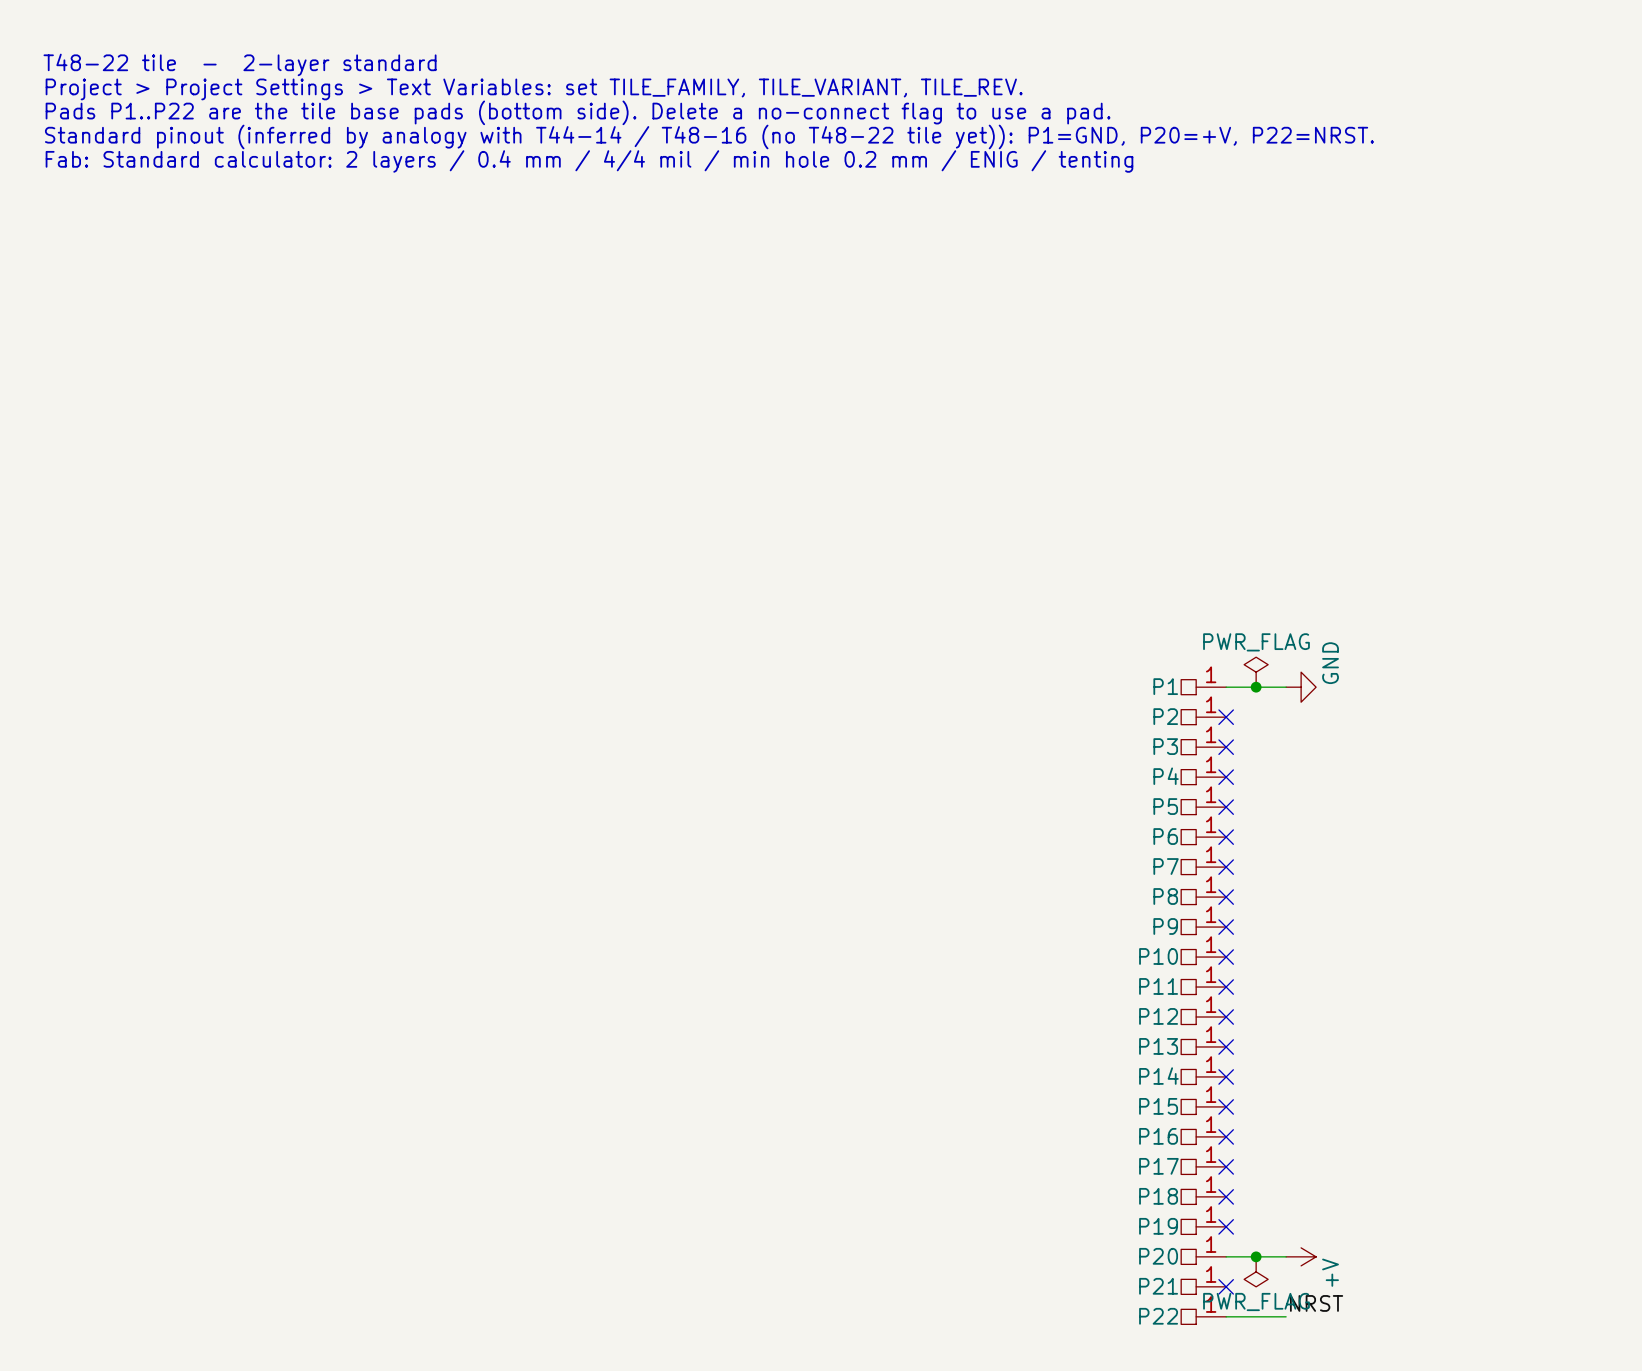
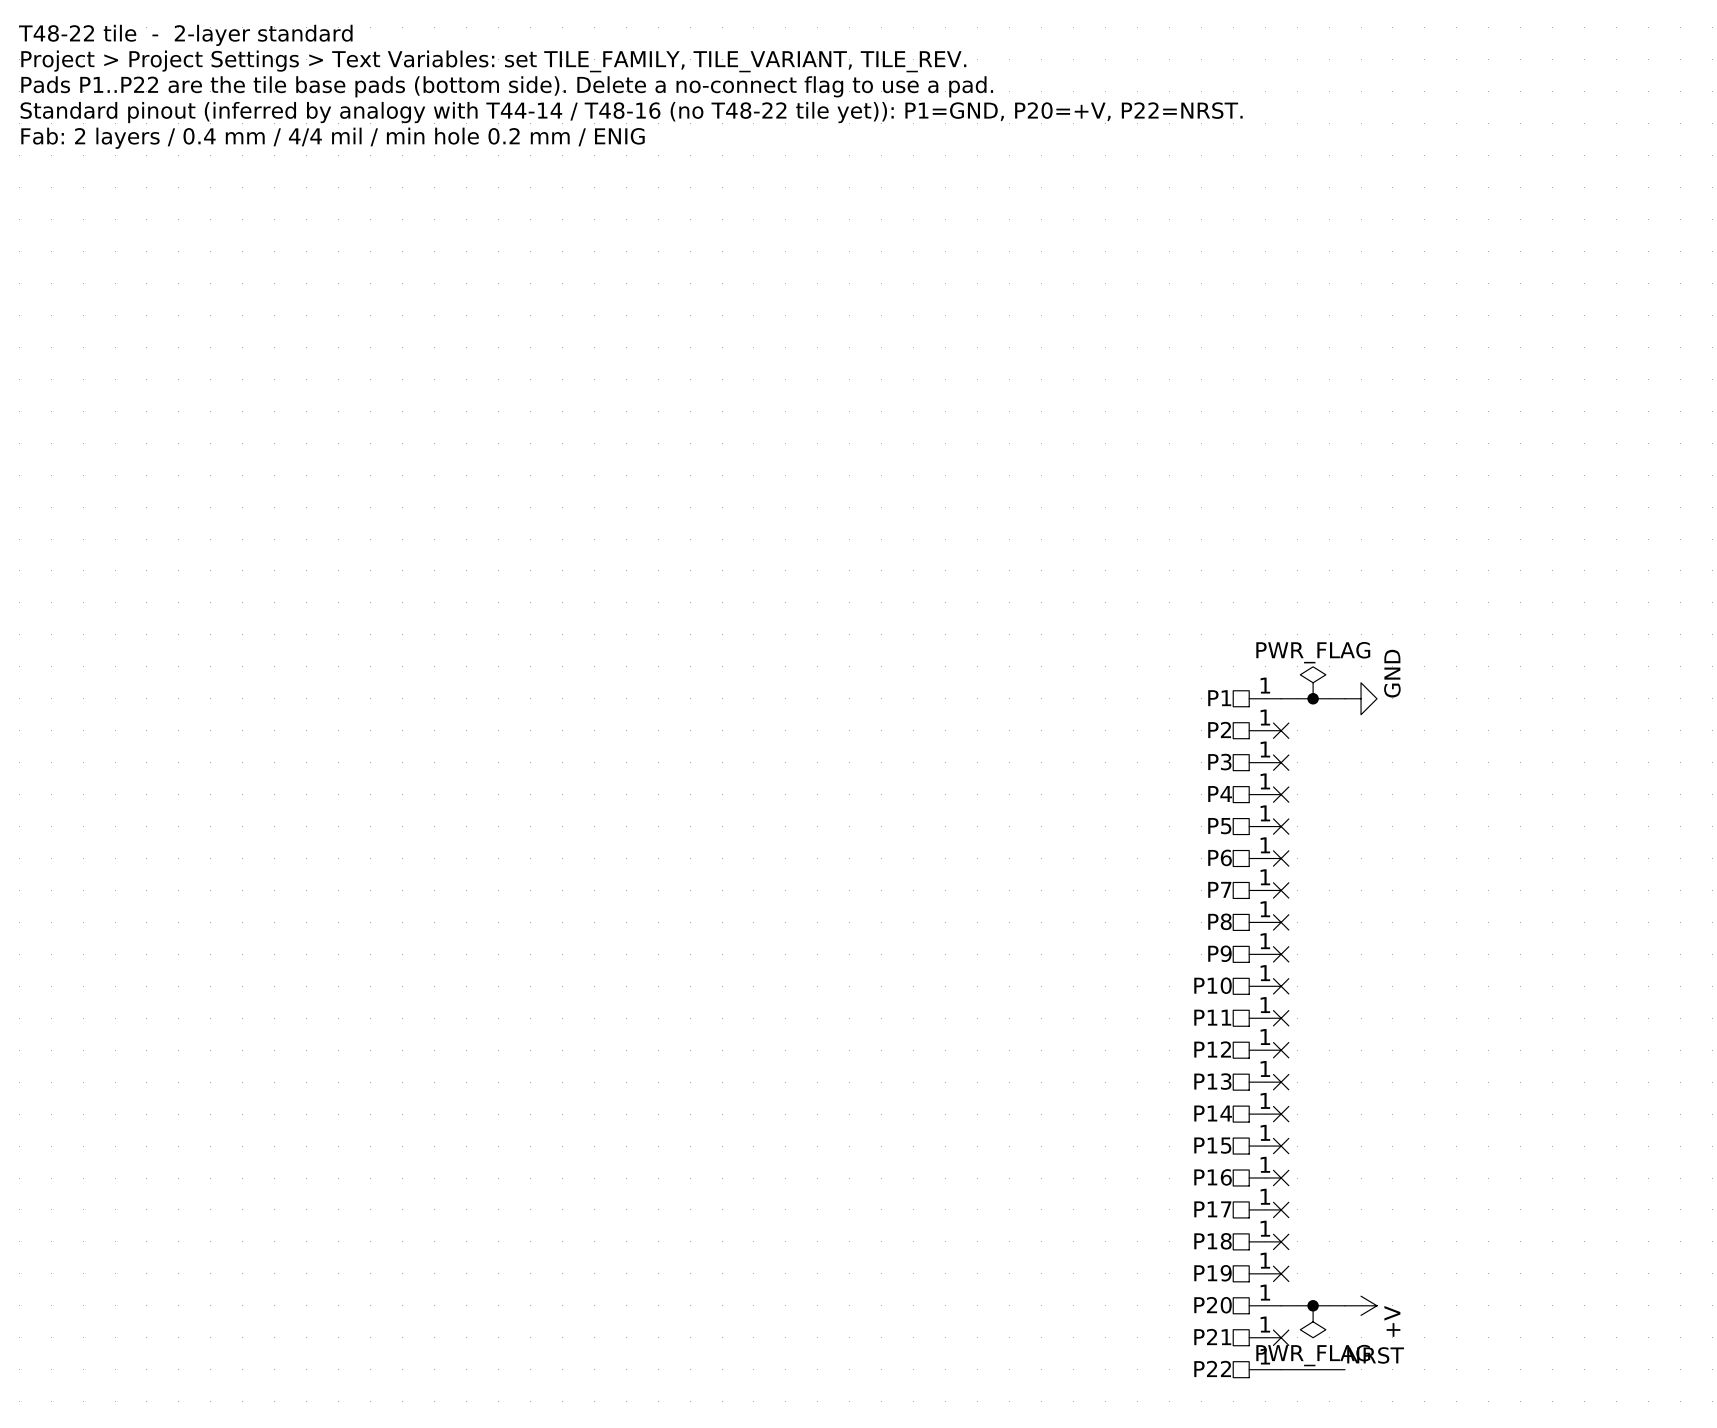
text: Fab: Standard calculator: 2 layers / 0.4 mm / 4/4 mil / min hole 0.2 mm / ENIG / tenting (589, 161) -> Fab: 2 layers / 0.4 mm / 4/4 mil / min hole 0.2 mm / ENIG (333, 138)

